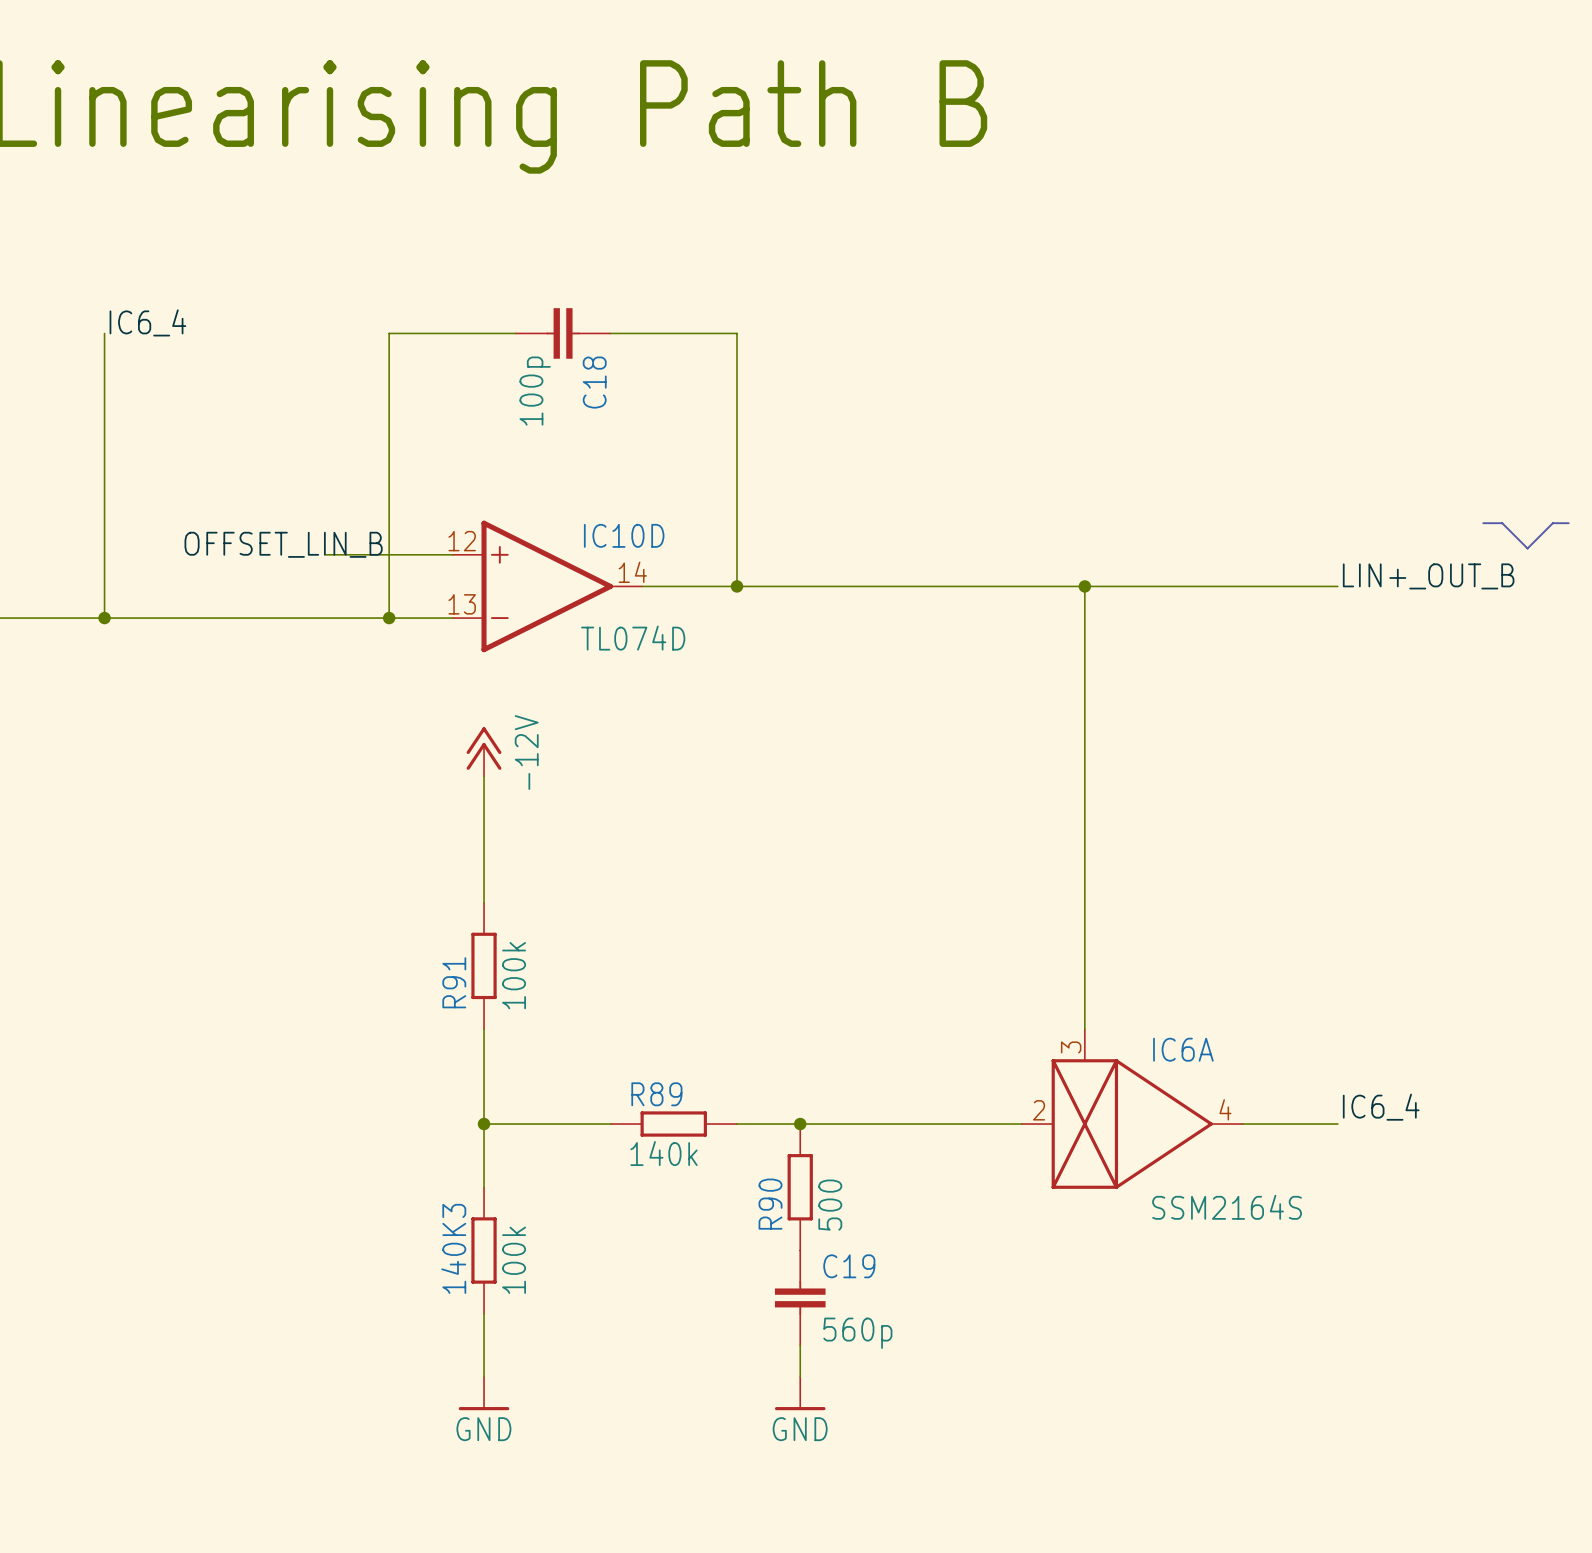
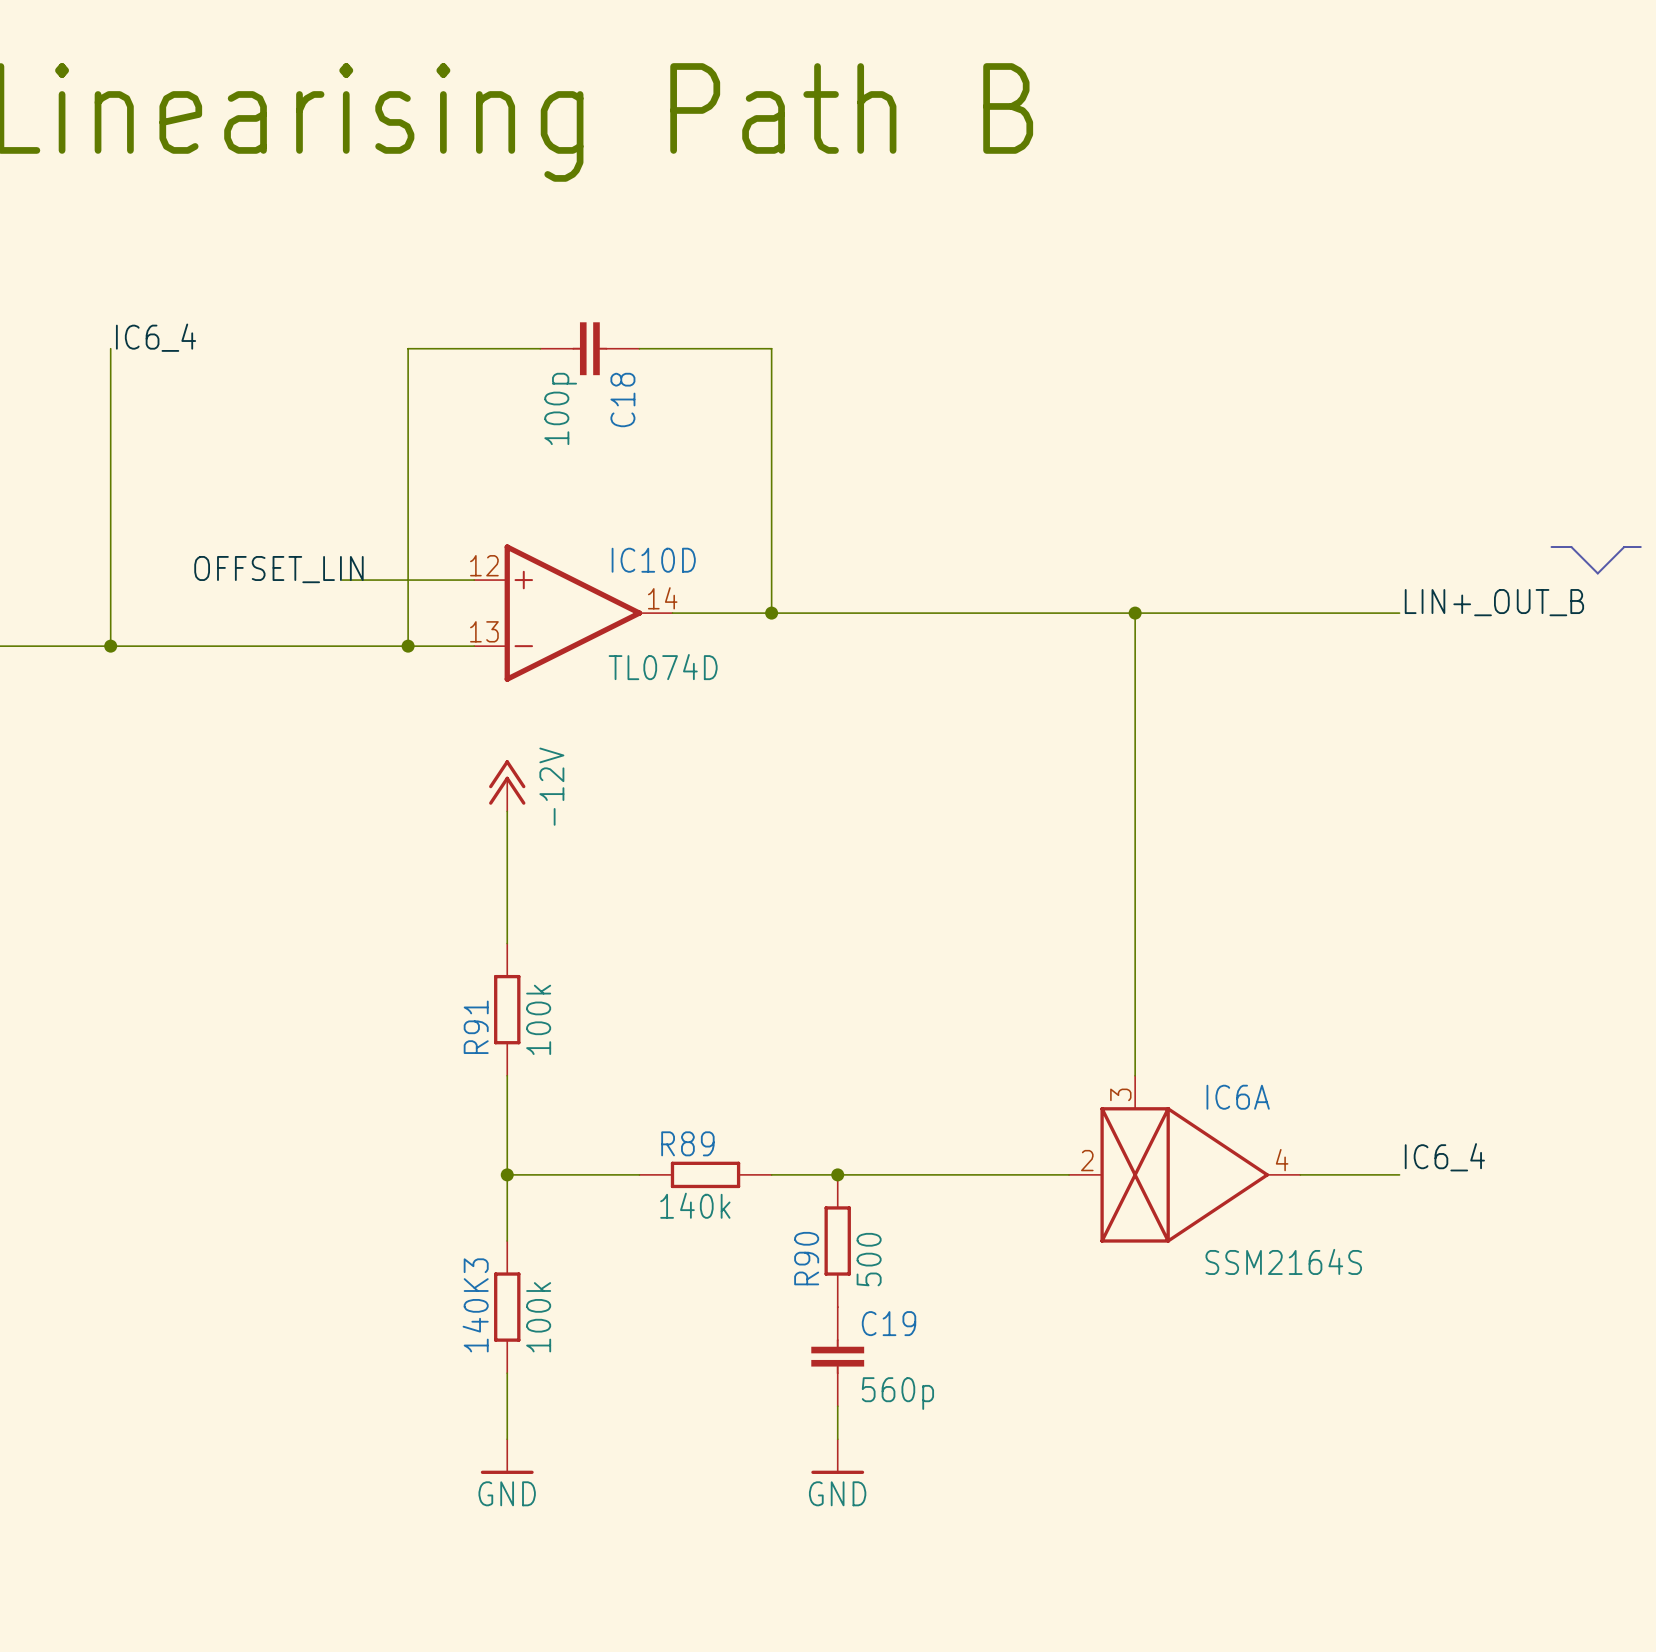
label: OFFSET_LIN_B (283, 544) -> OFFSET_LIN (278, 569)

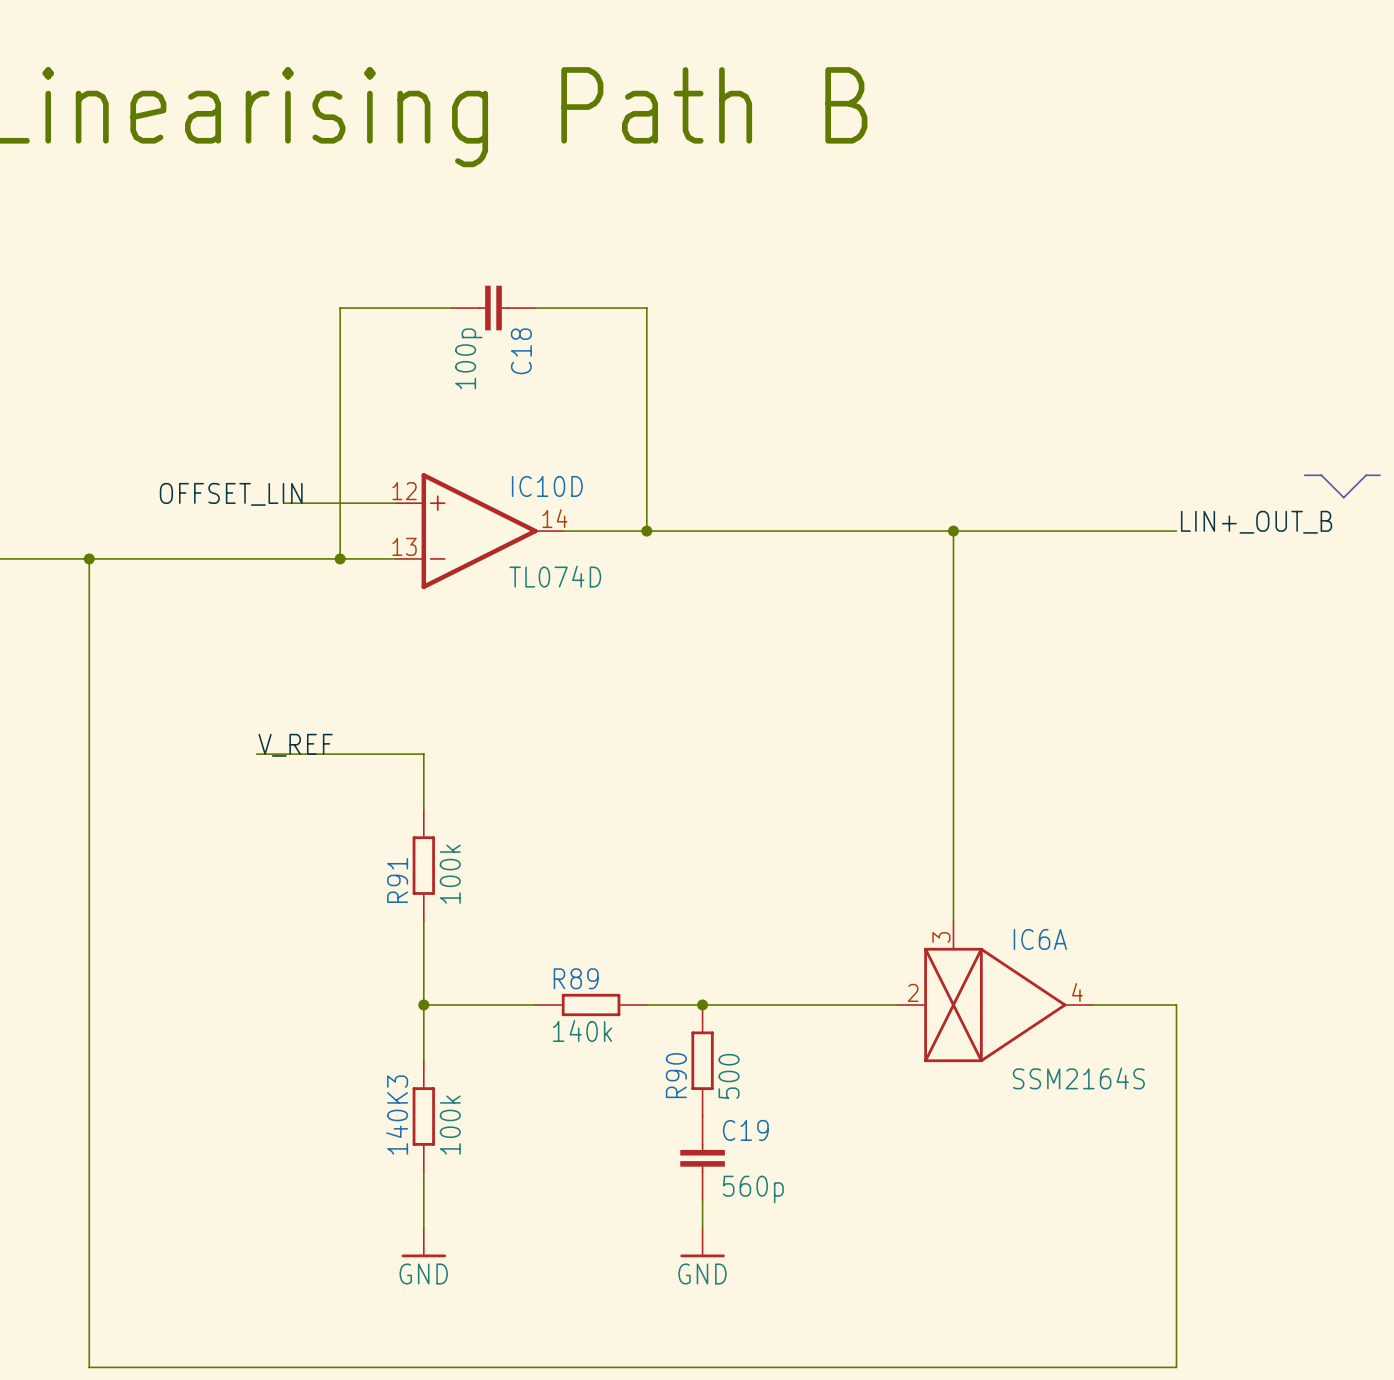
label: IC6_4 (156, 337) -> none
wire: (110, 348) (110, 646) -> (1176, 1004) (1176, 1367) (89, 1367) (89, 558)
power symbol: -12V (507, 785) -> none
wire: (507, 811) (507, 877) -> (256, 754) (423, 754)
label: none -> V_REF (295, 745)
label: IC6_4 (1444, 1157) -> none

